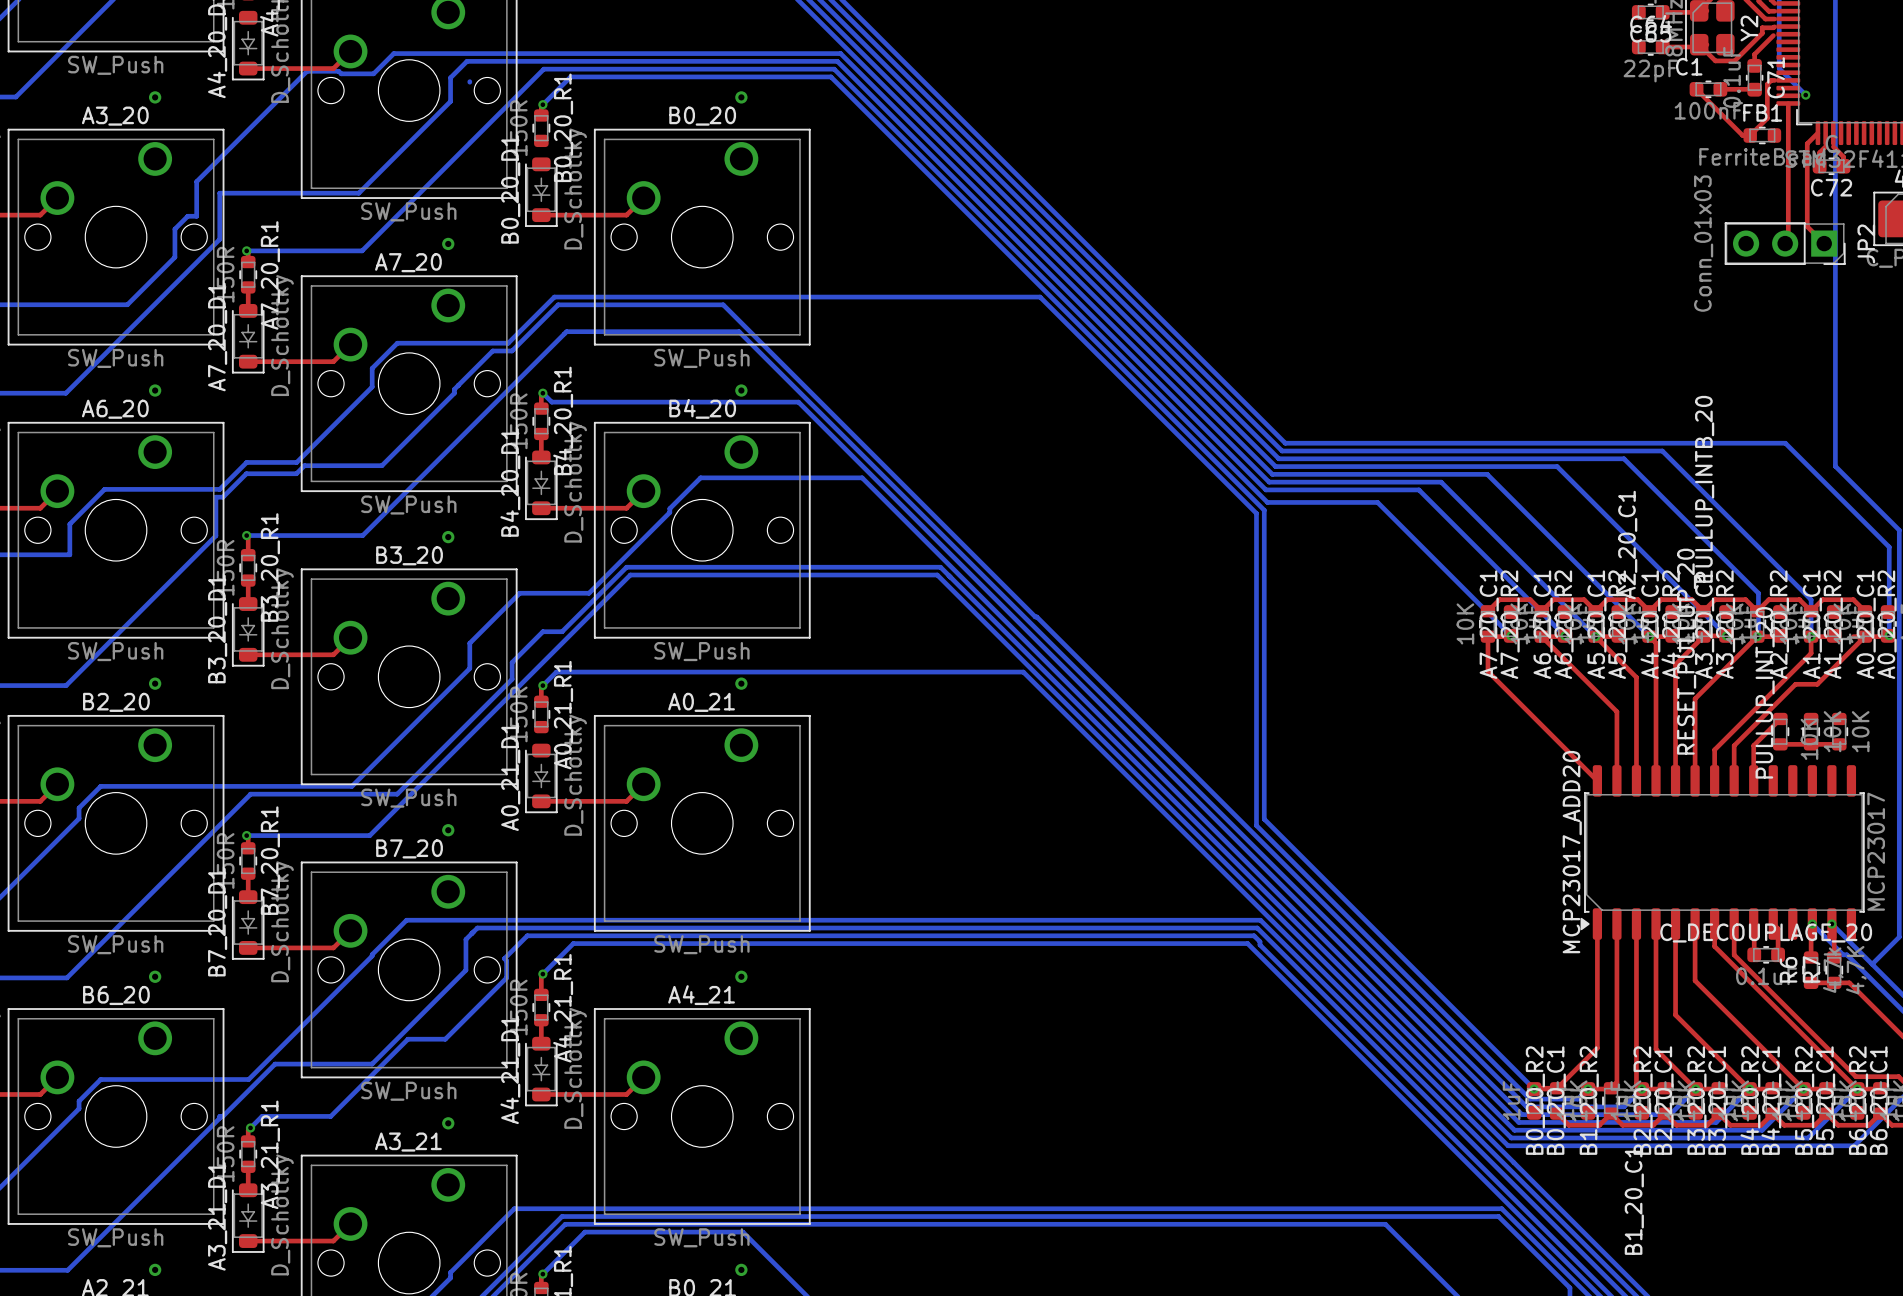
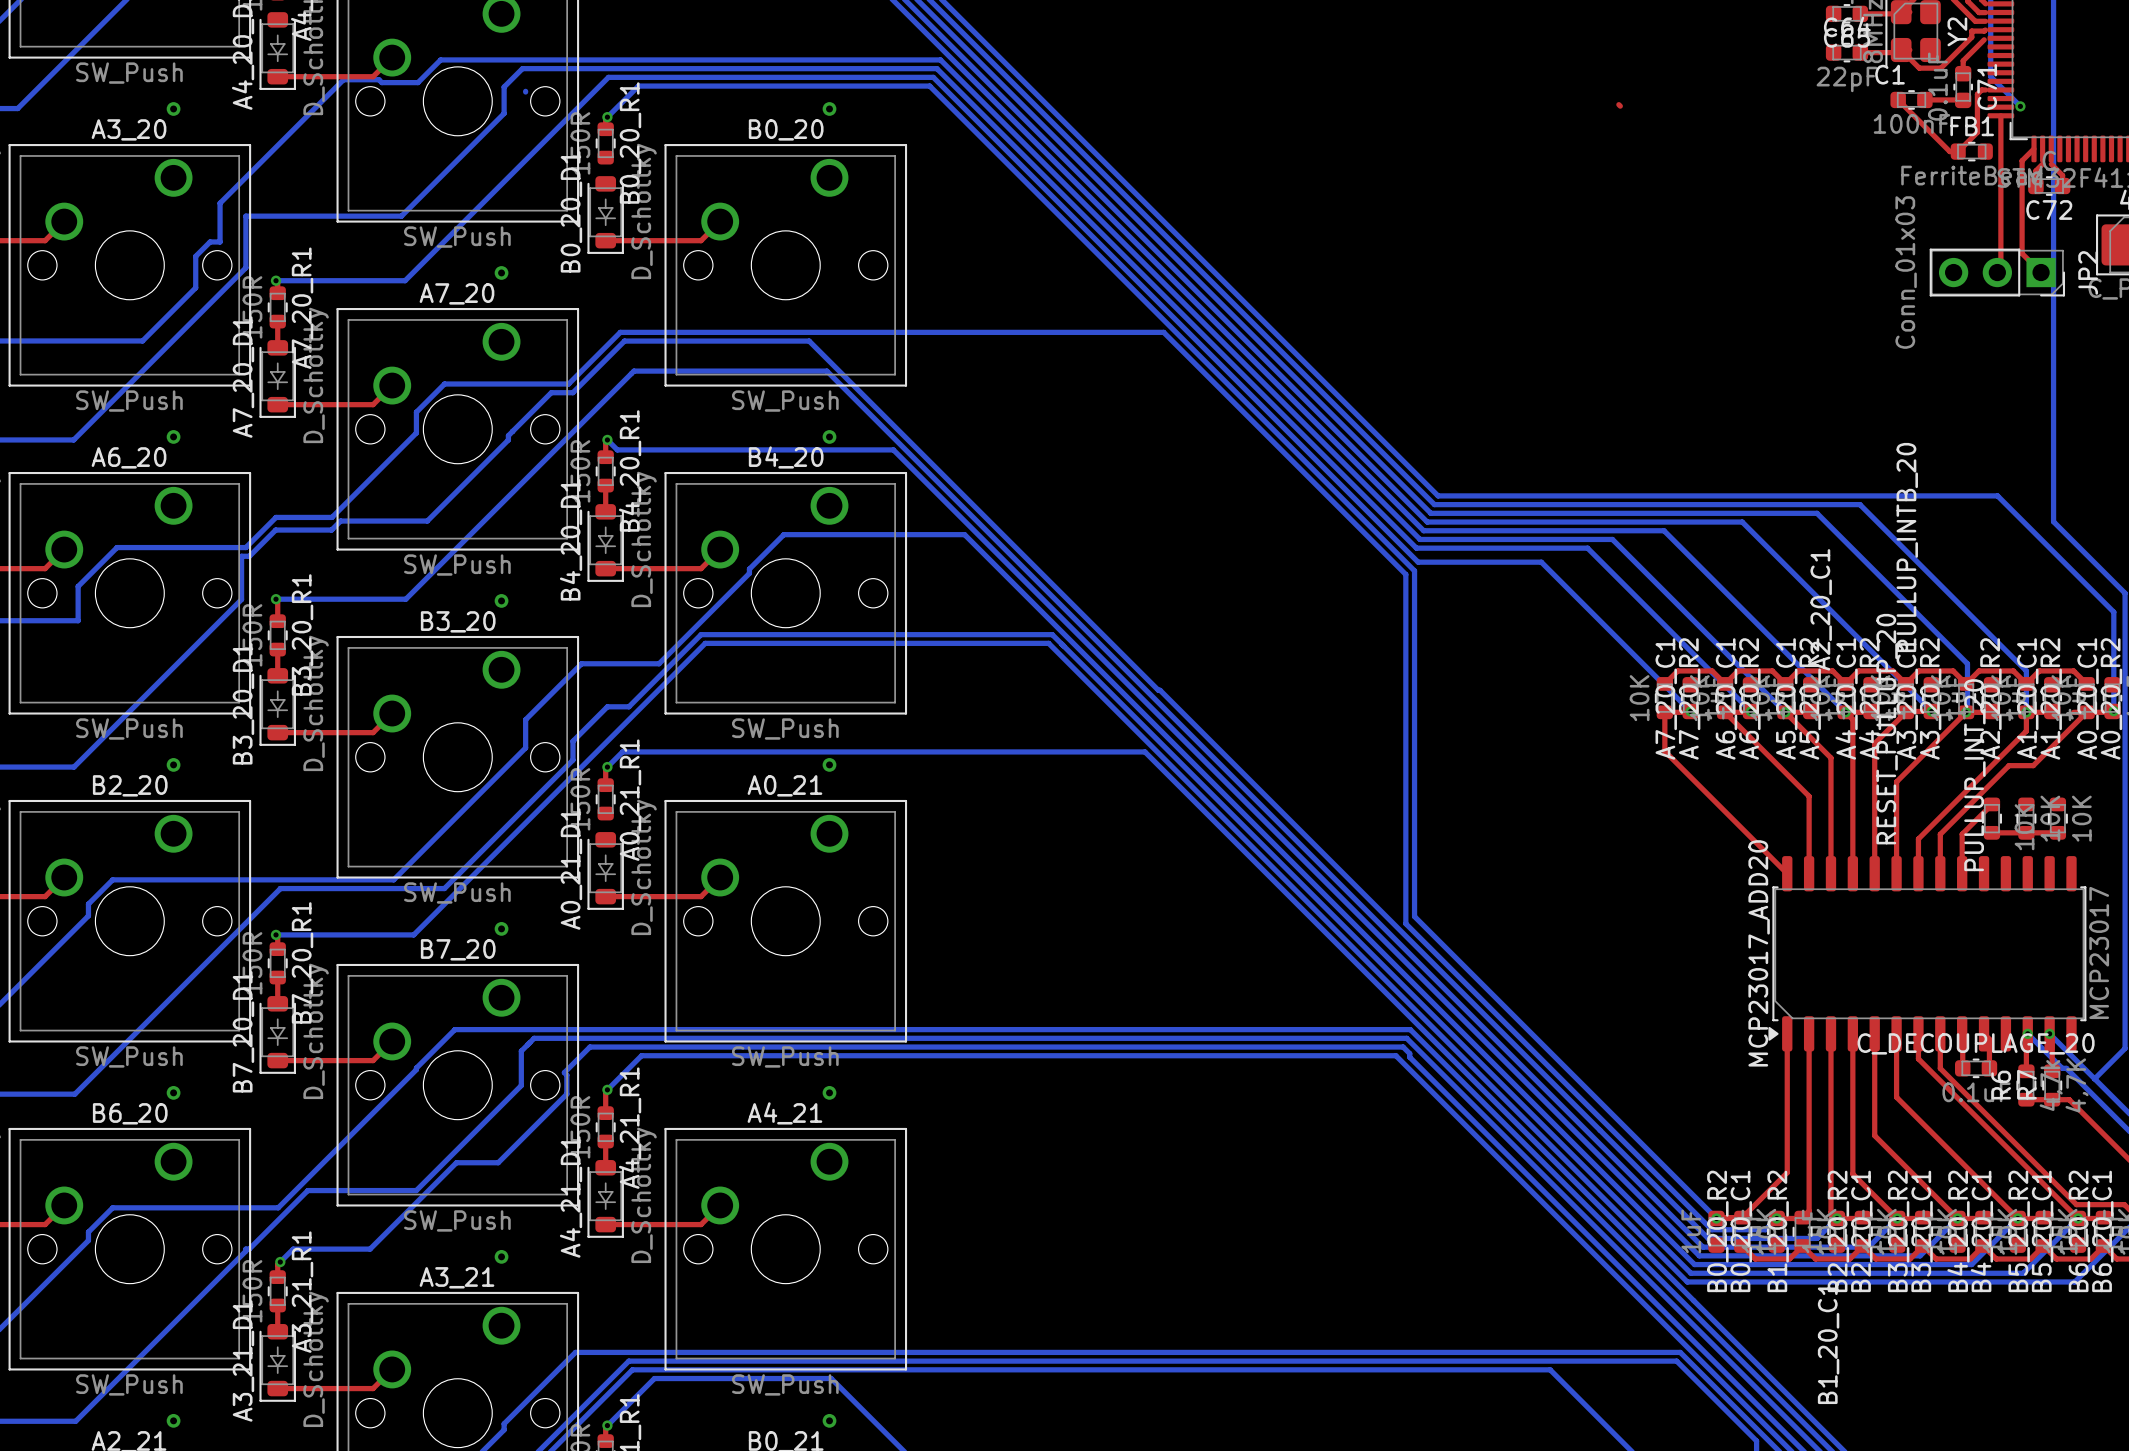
top track: none -> (1618, 104) (1620, 106)

